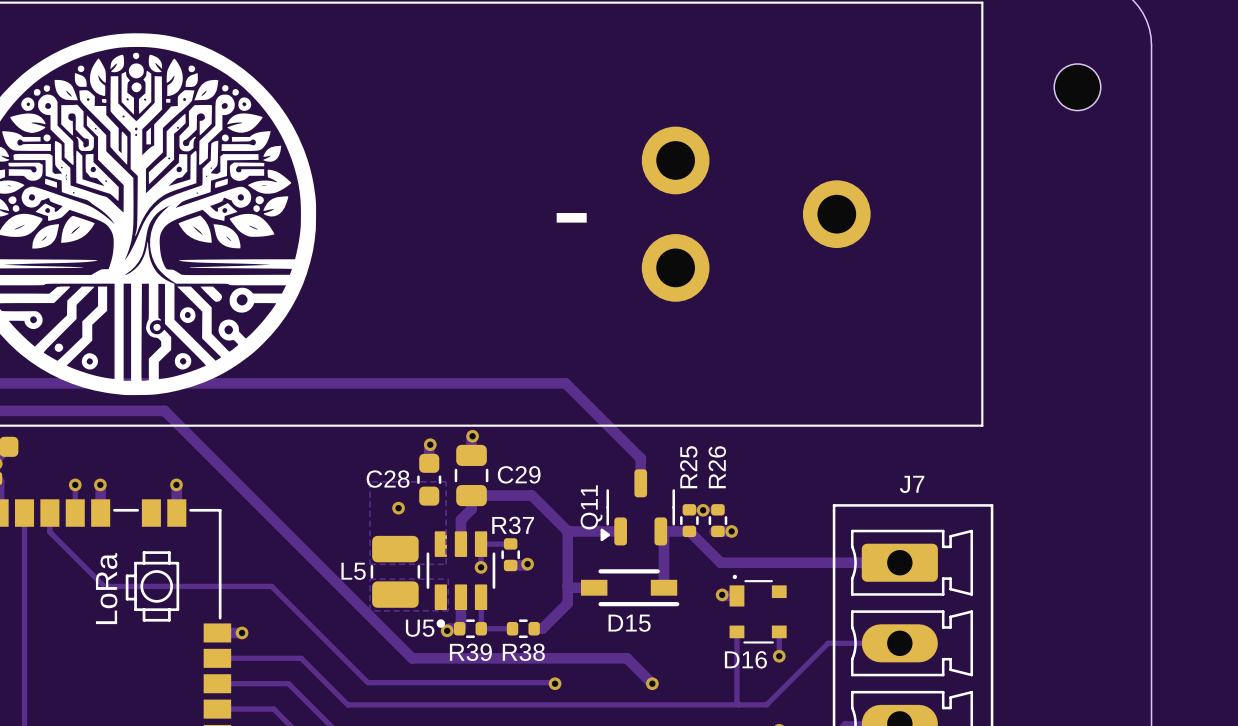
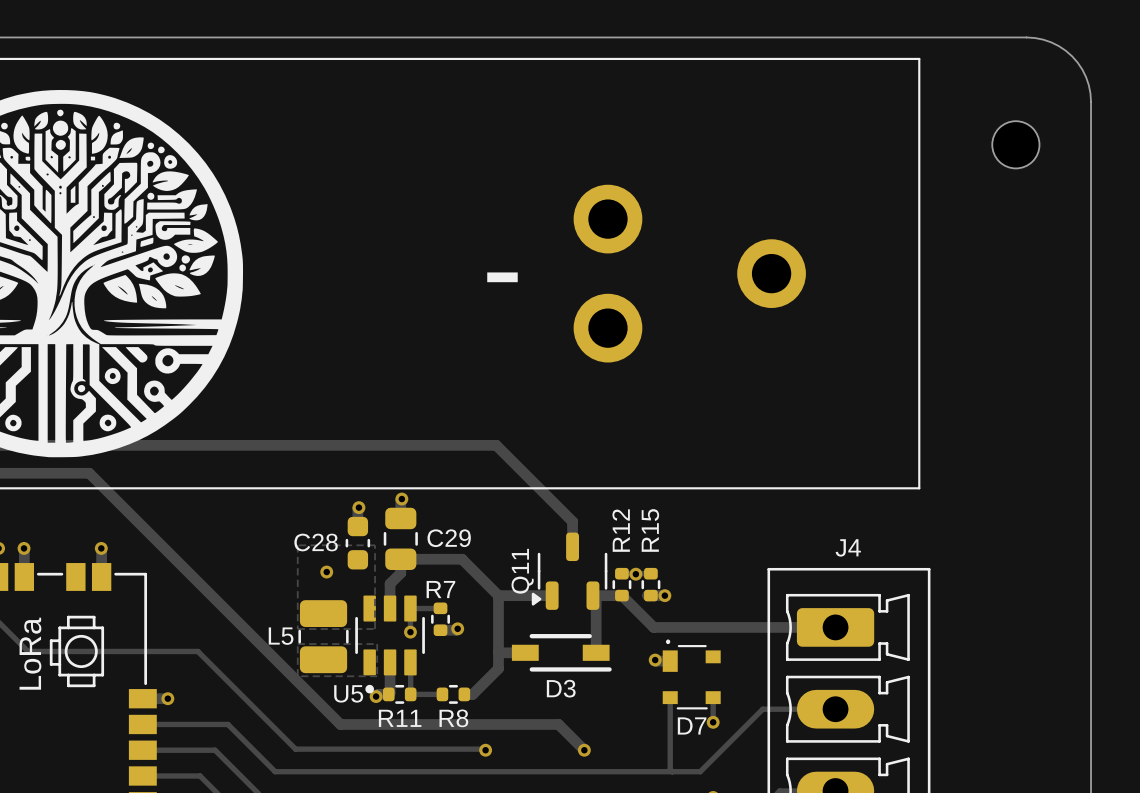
R25 name: R25 (688, 467) -> R12 (621, 530)
R26 name: R26 (717, 467) -> R15 (650, 530)
J7 name: J7 (912, 484) -> J4 (848, 547)
R37 name: R37 (513, 525) -> R7 (440, 589)
D15 name: D15 (629, 623) -> D3 (561, 688)
R39 name: R39 (470, 652) -> R11 (400, 718)
R38 name: R38 (523, 652) -> R8 (453, 718)
D16 name: D16 (745, 659) -> D7 (692, 725)

